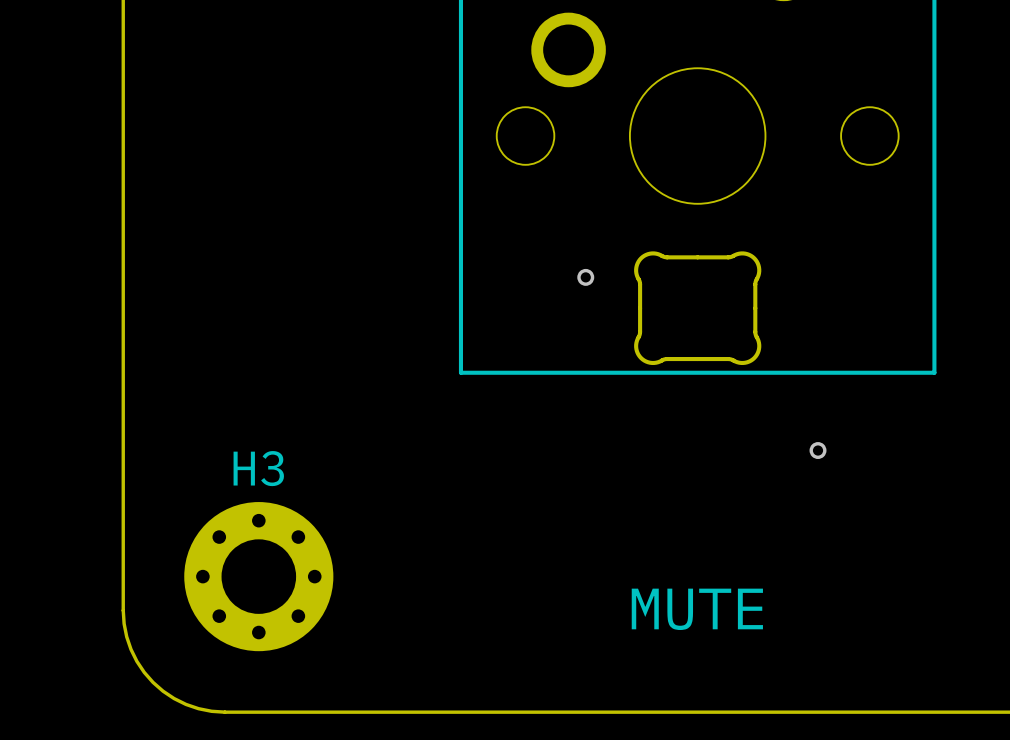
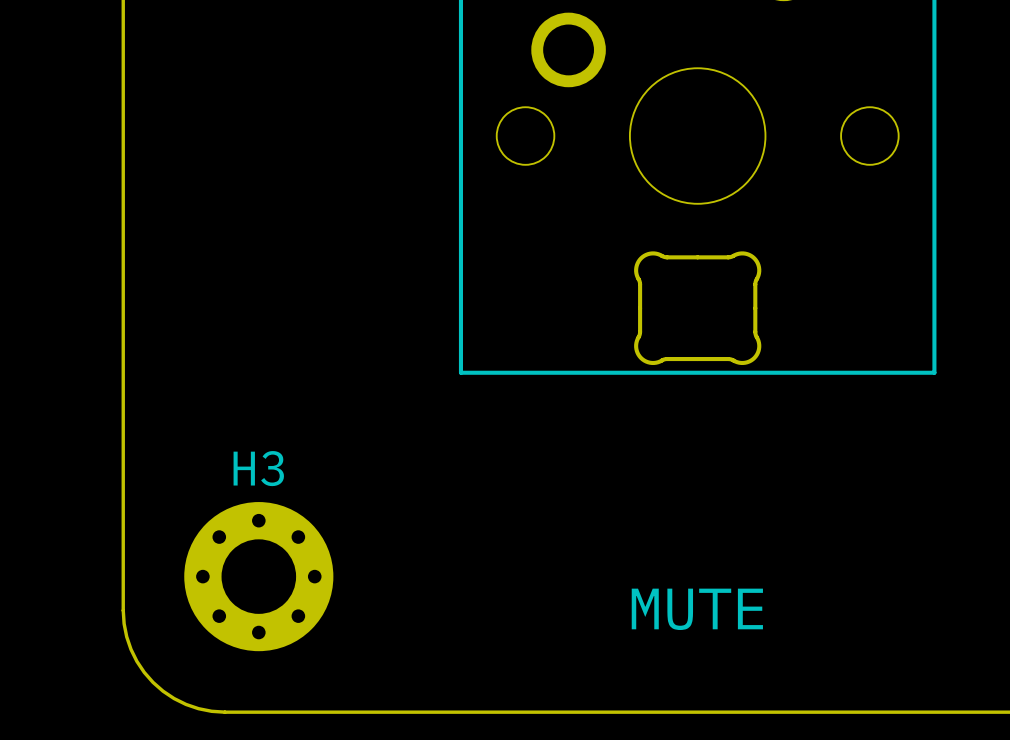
via: (585, 277) -> none
via: (818, 450) -> none

